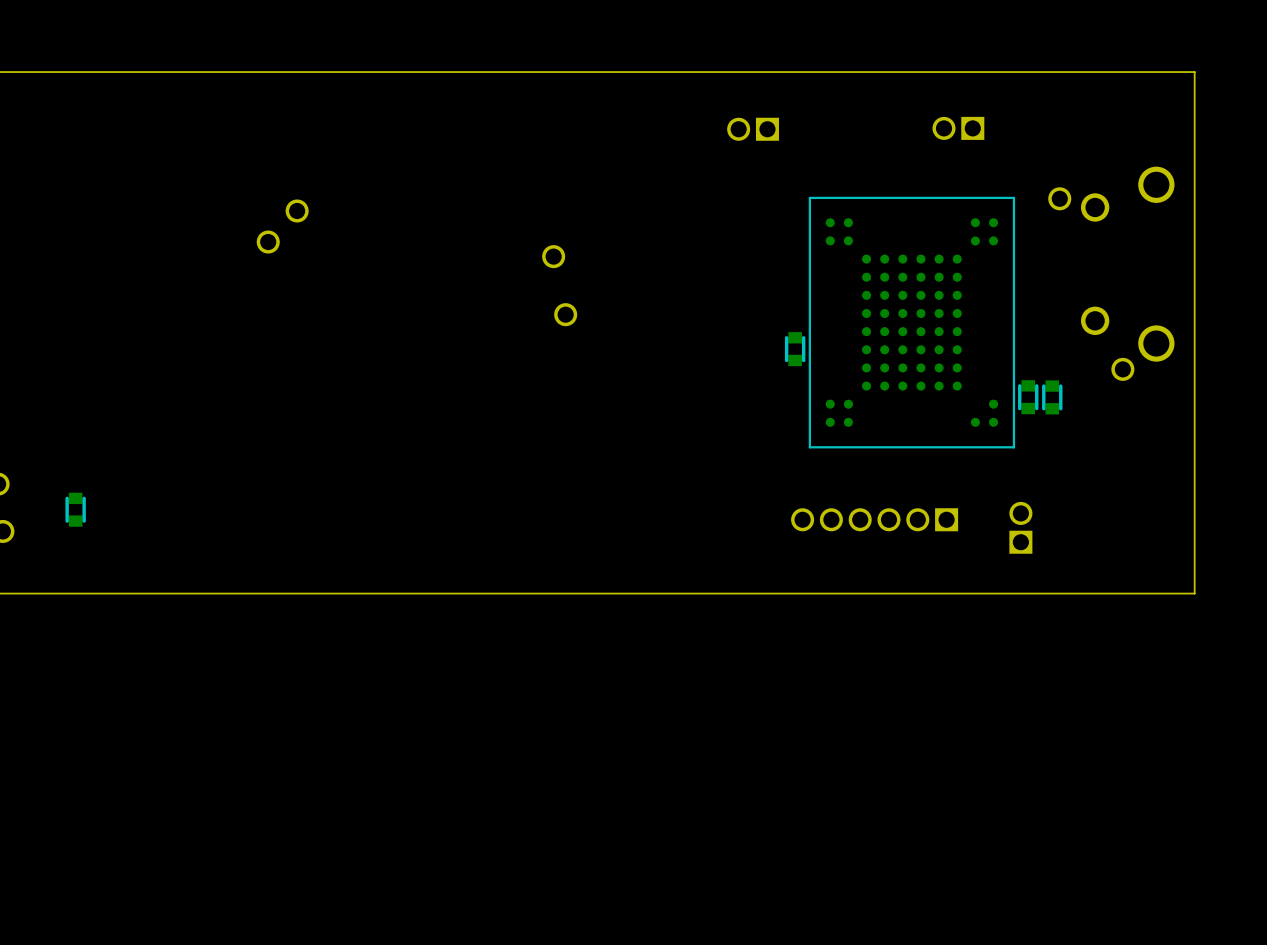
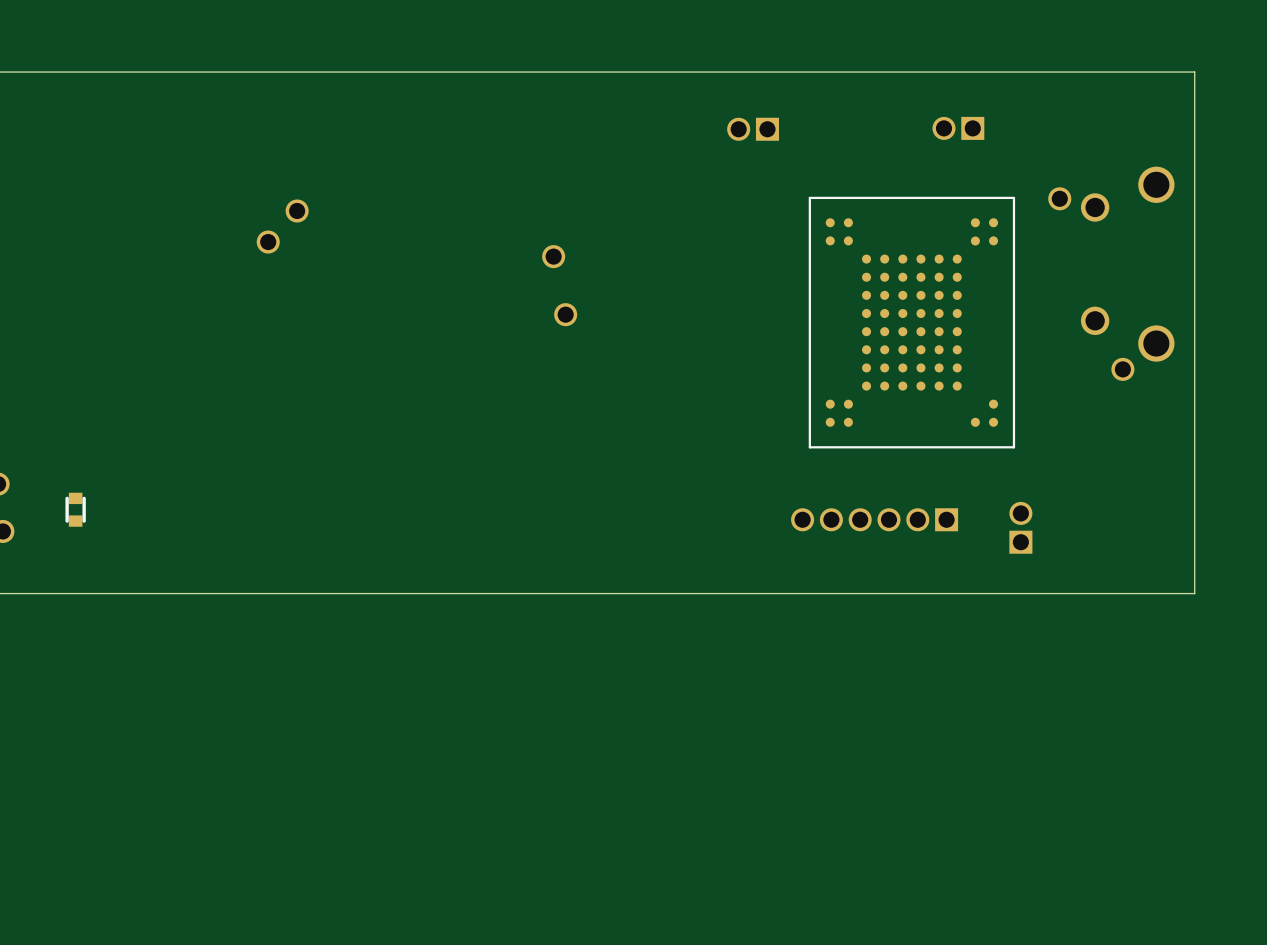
part: (795, 349) -> none
part: (1028, 397) -> none
part: (1052, 397) -> none

